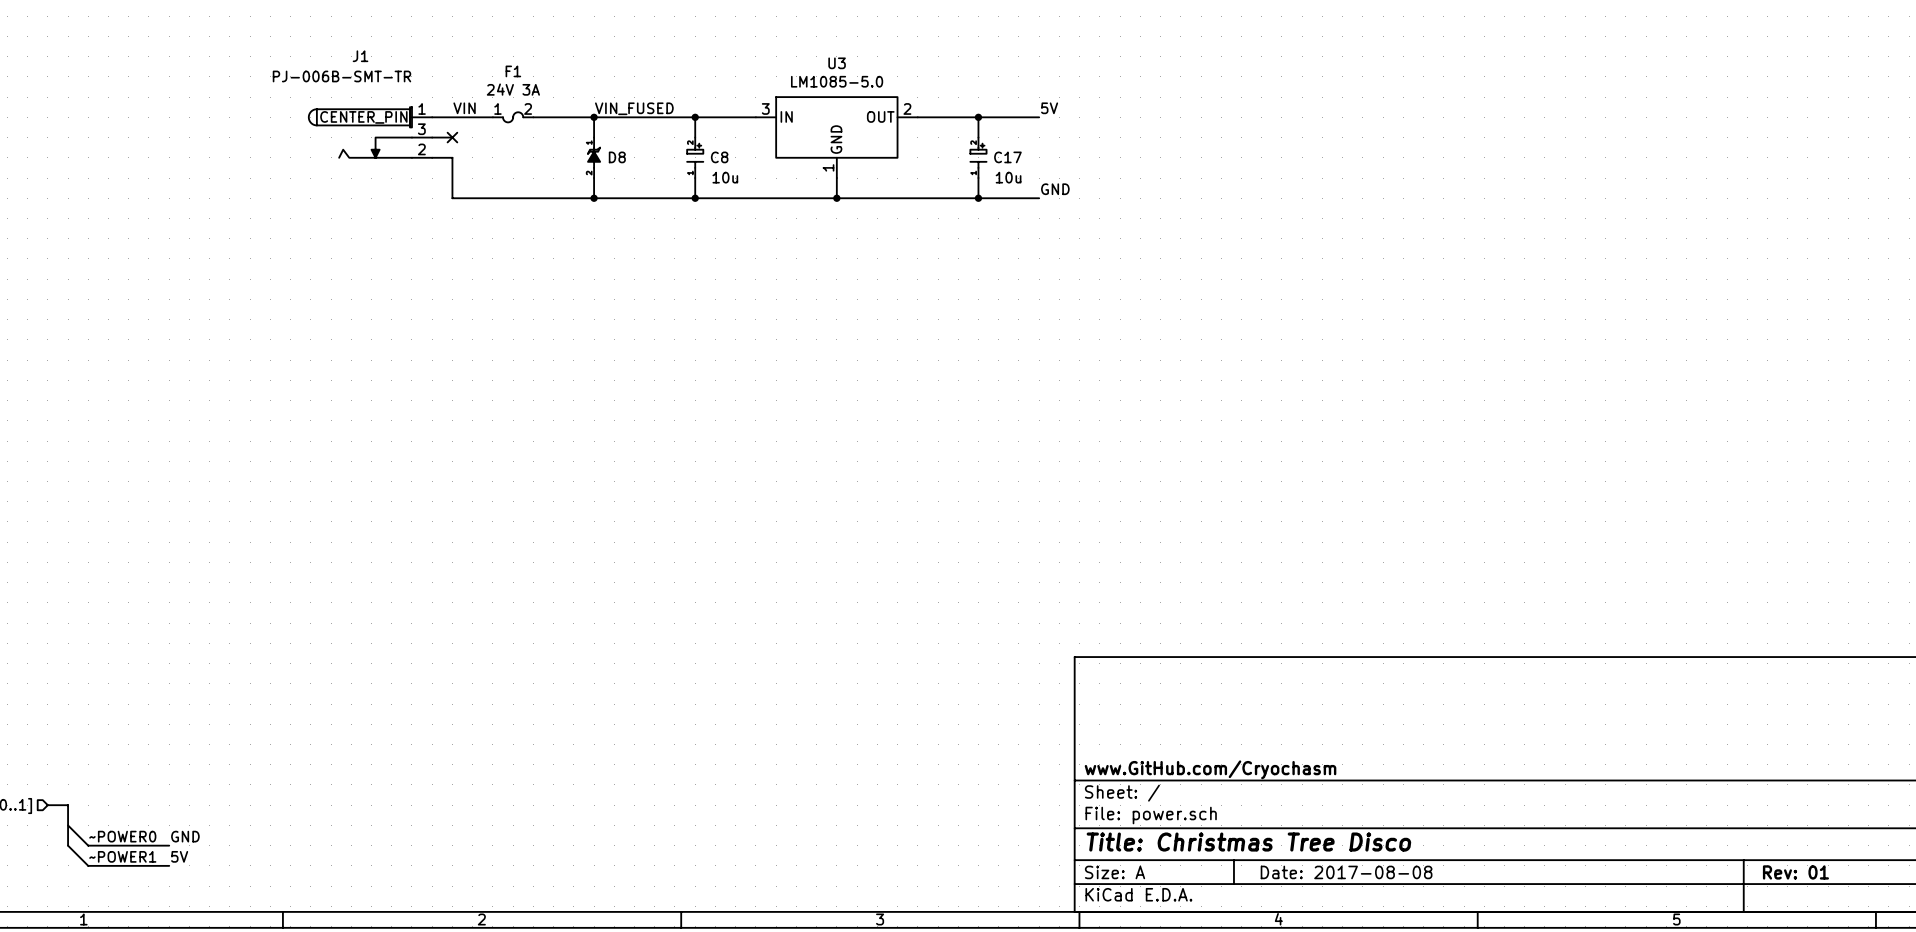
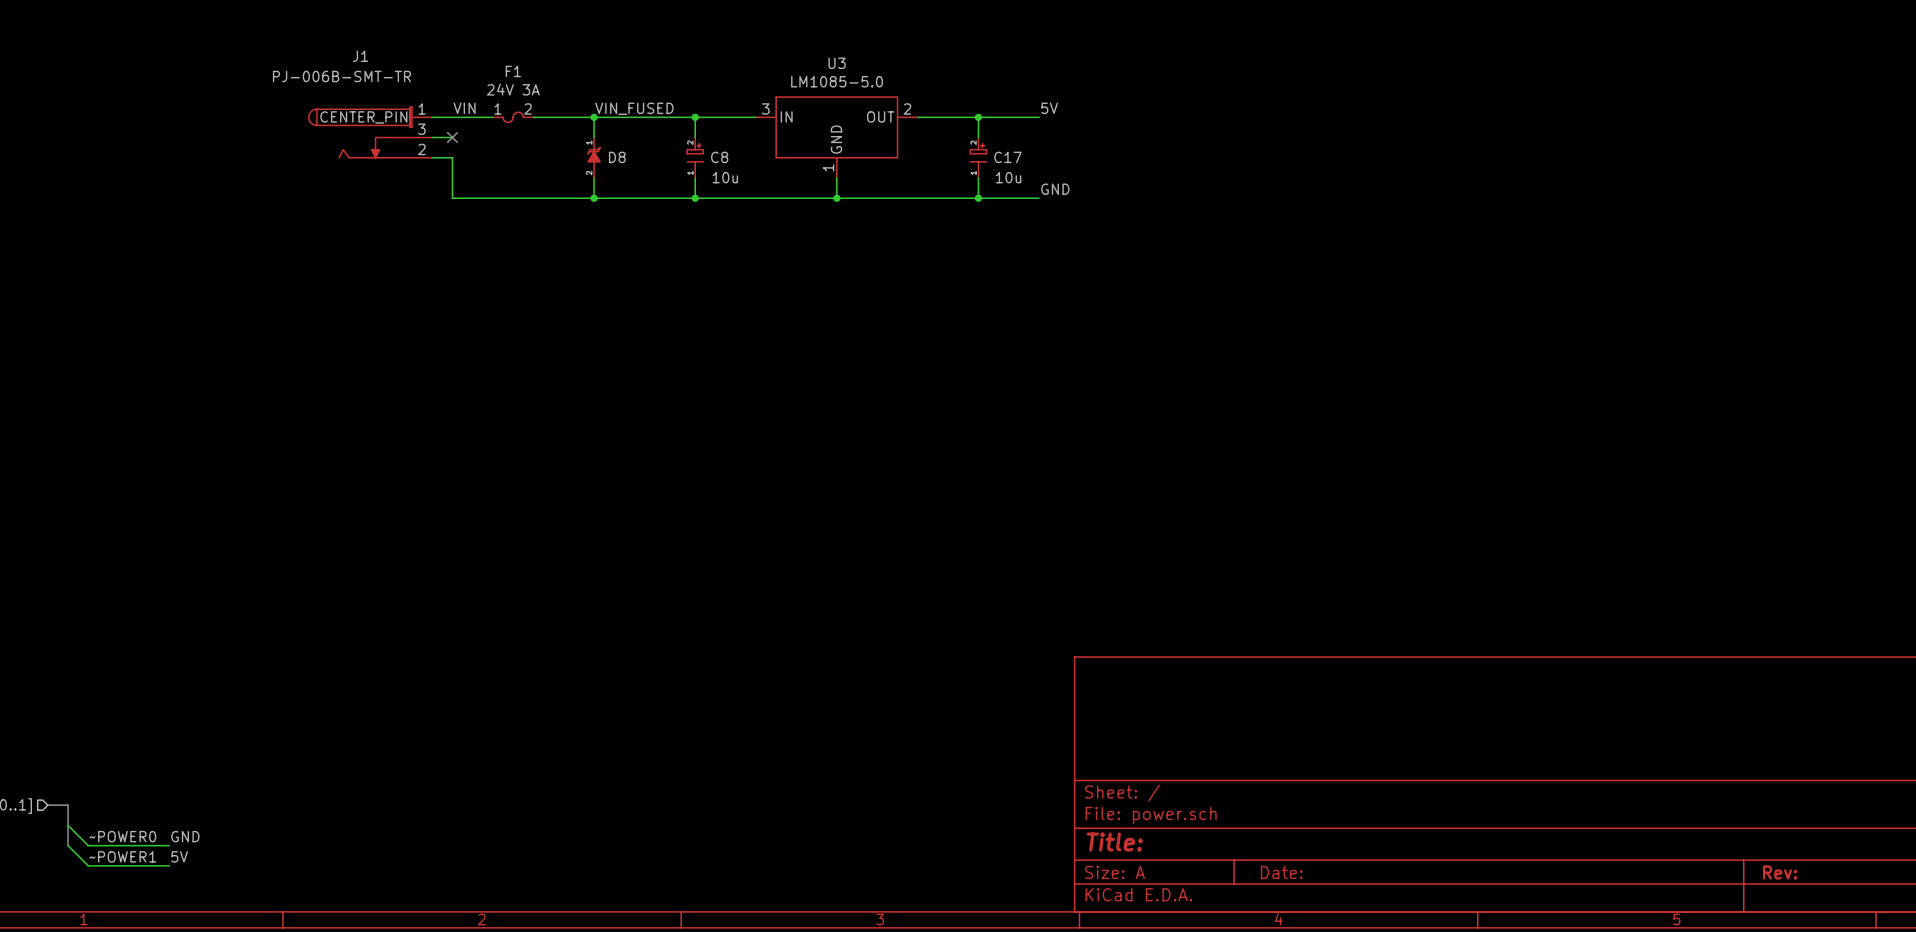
title block: www.GitHub.com/Cryochasm (1210, 769) -> none
title block: Title: Christmas Tree Disco (1248, 842) -> Title: (1114, 842)
title block: Date: 2017-08-08 (1346, 872) -> Date: (1281, 872)
title block: Rev: 01 (1795, 872) -> Rev: (1780, 872)

